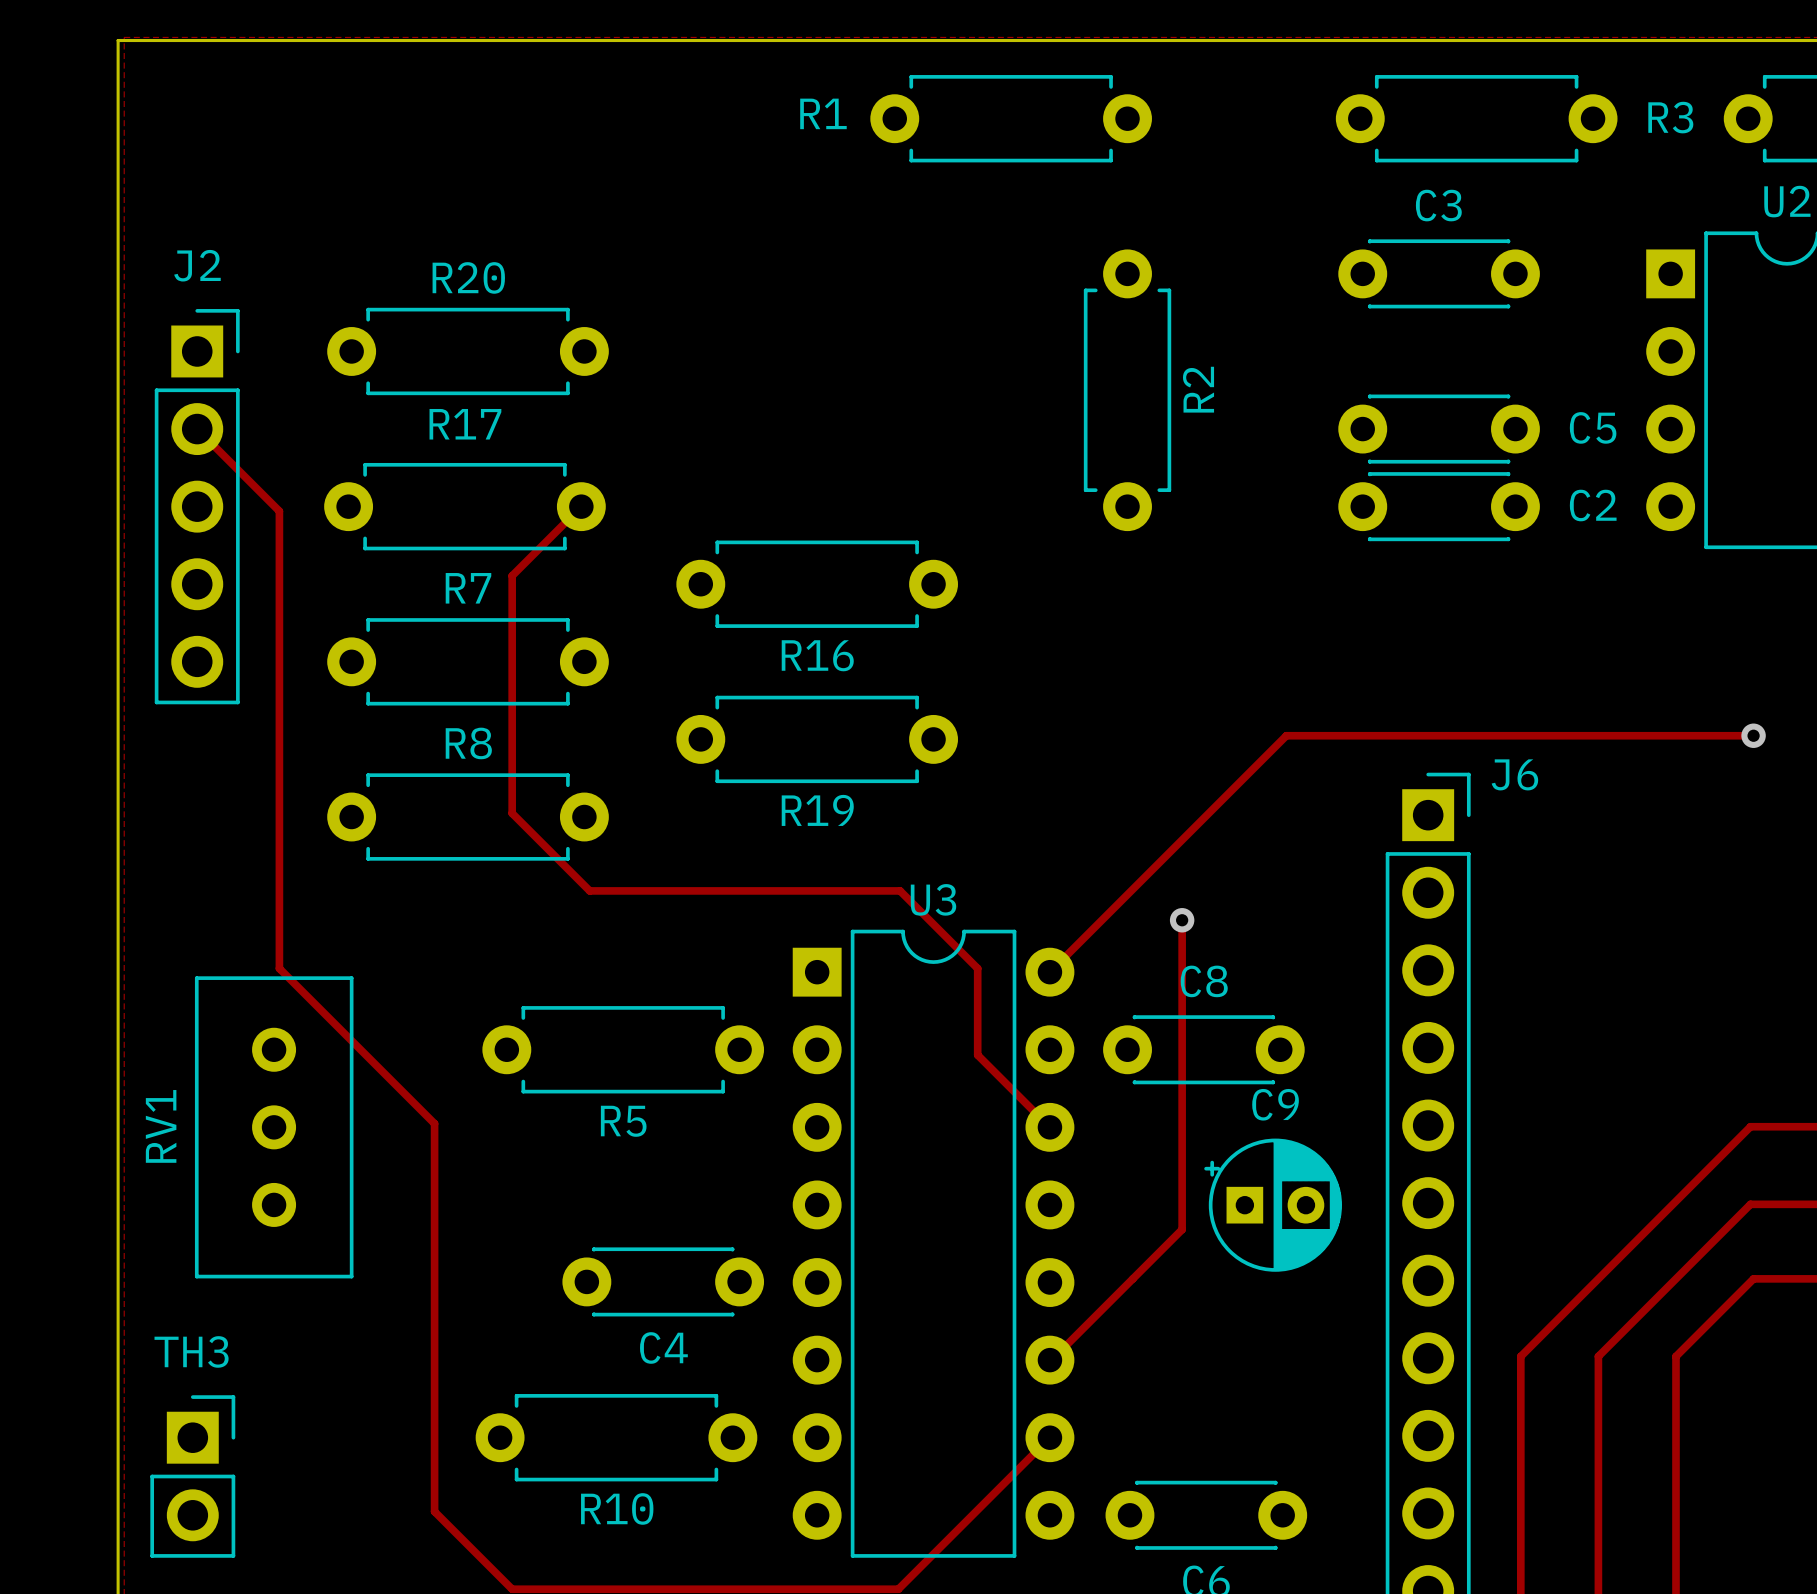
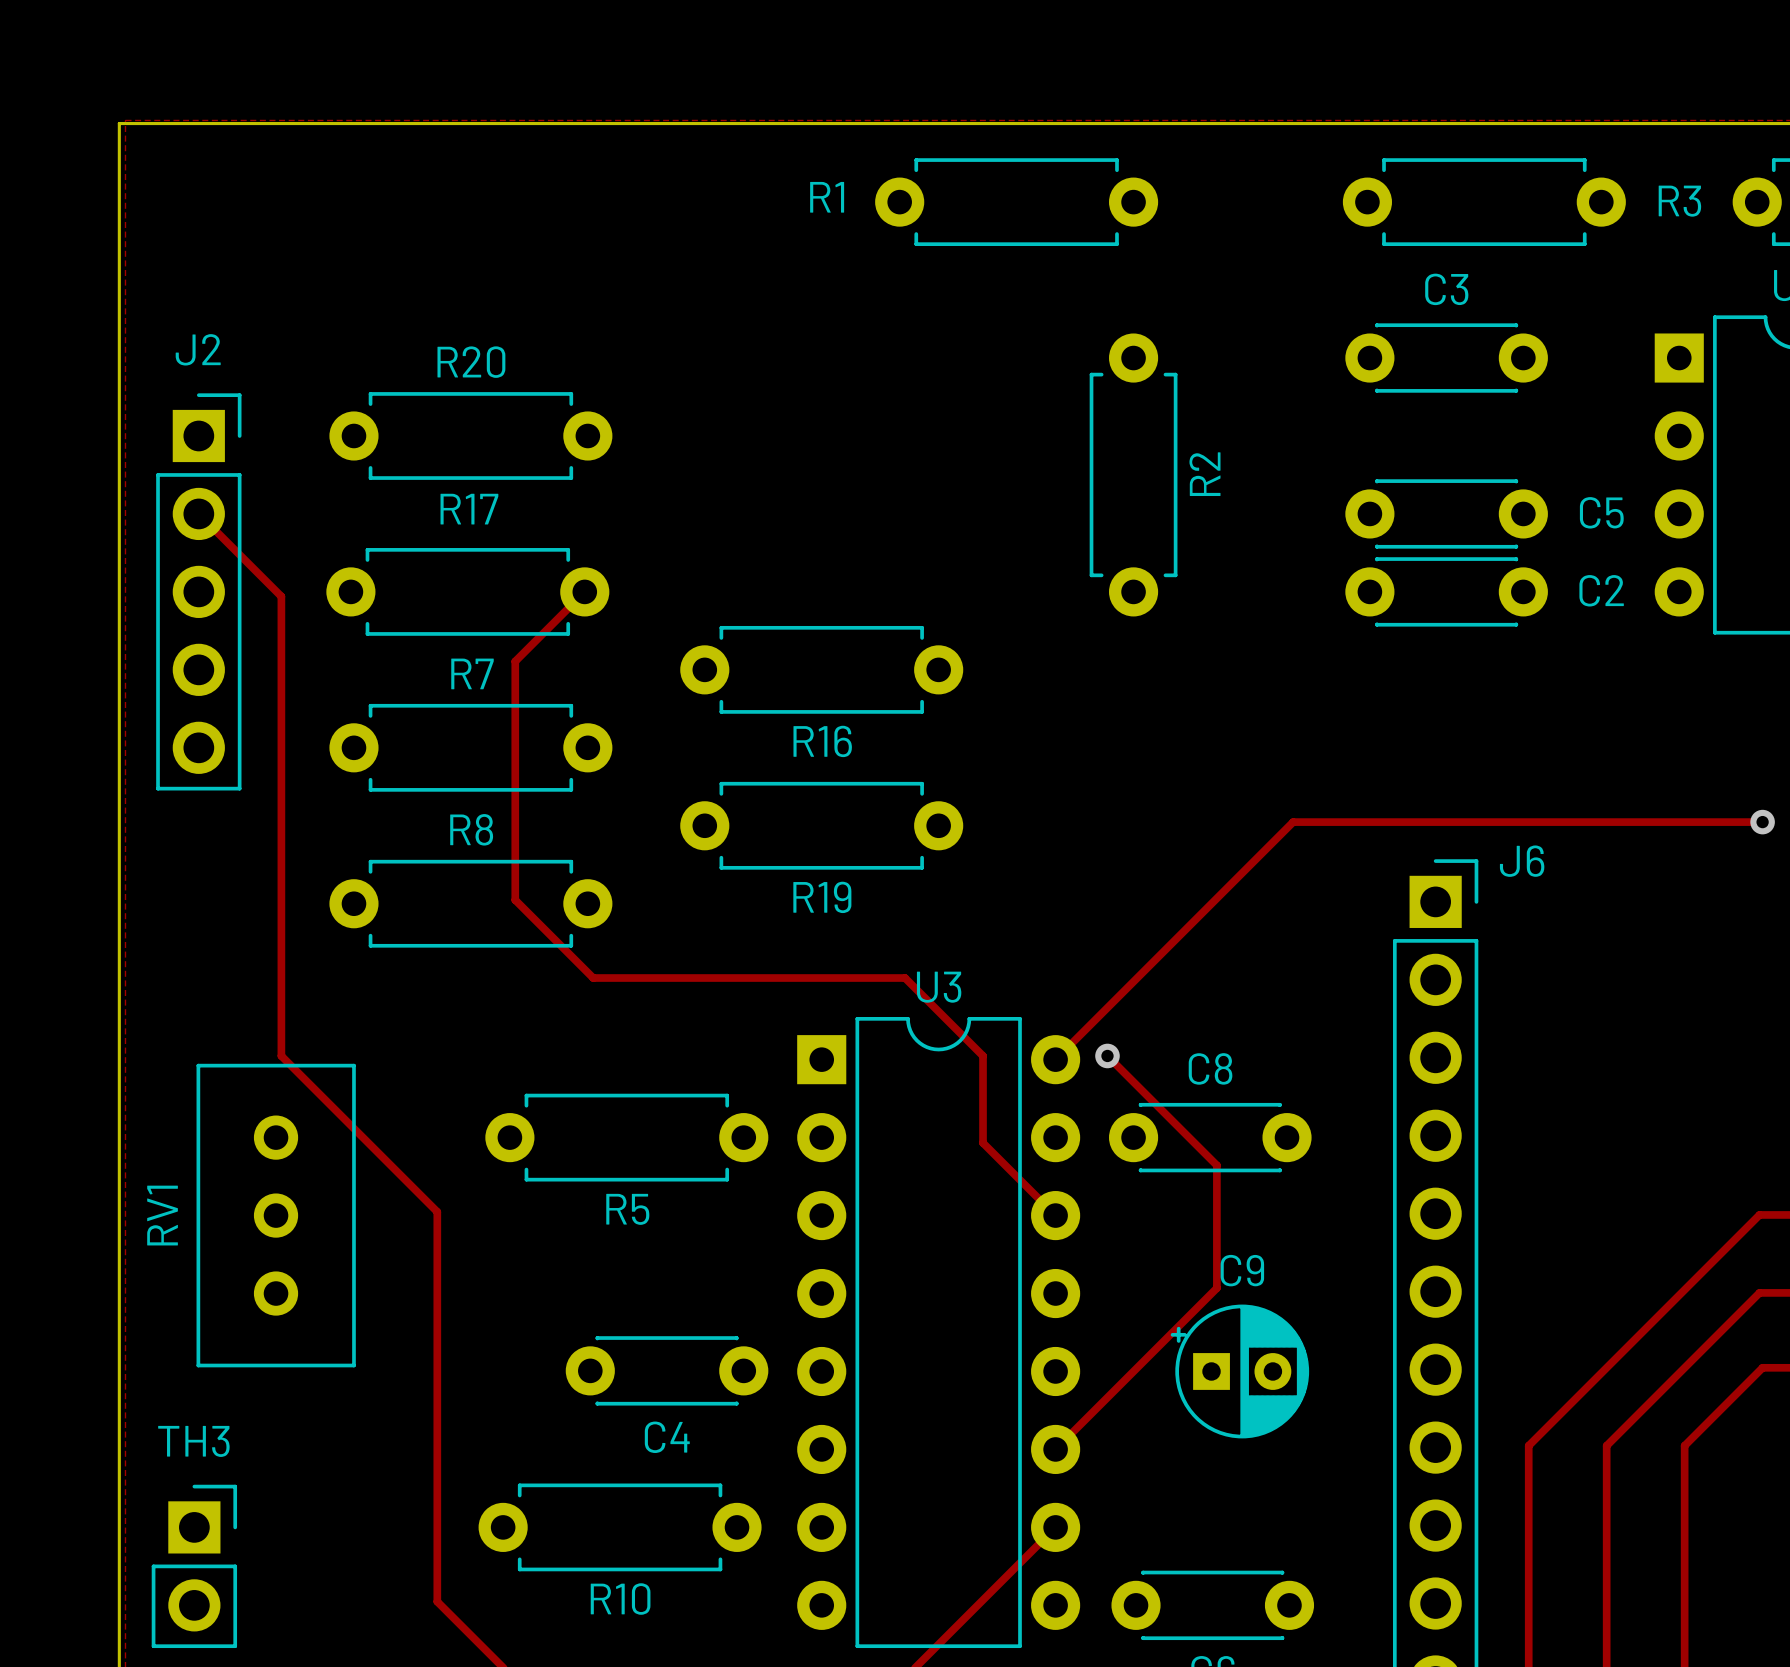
track: (1182, 920) (1182, 1229) (1055, 1356) -> none
via position: (1182, 920) -> (1107, 1055)
track: none -> (1107, 1055) (1216, 1165) (1216, 1288) (1055, 1449)
C9 position: (1273, 1205) -> (1239, 1371)

